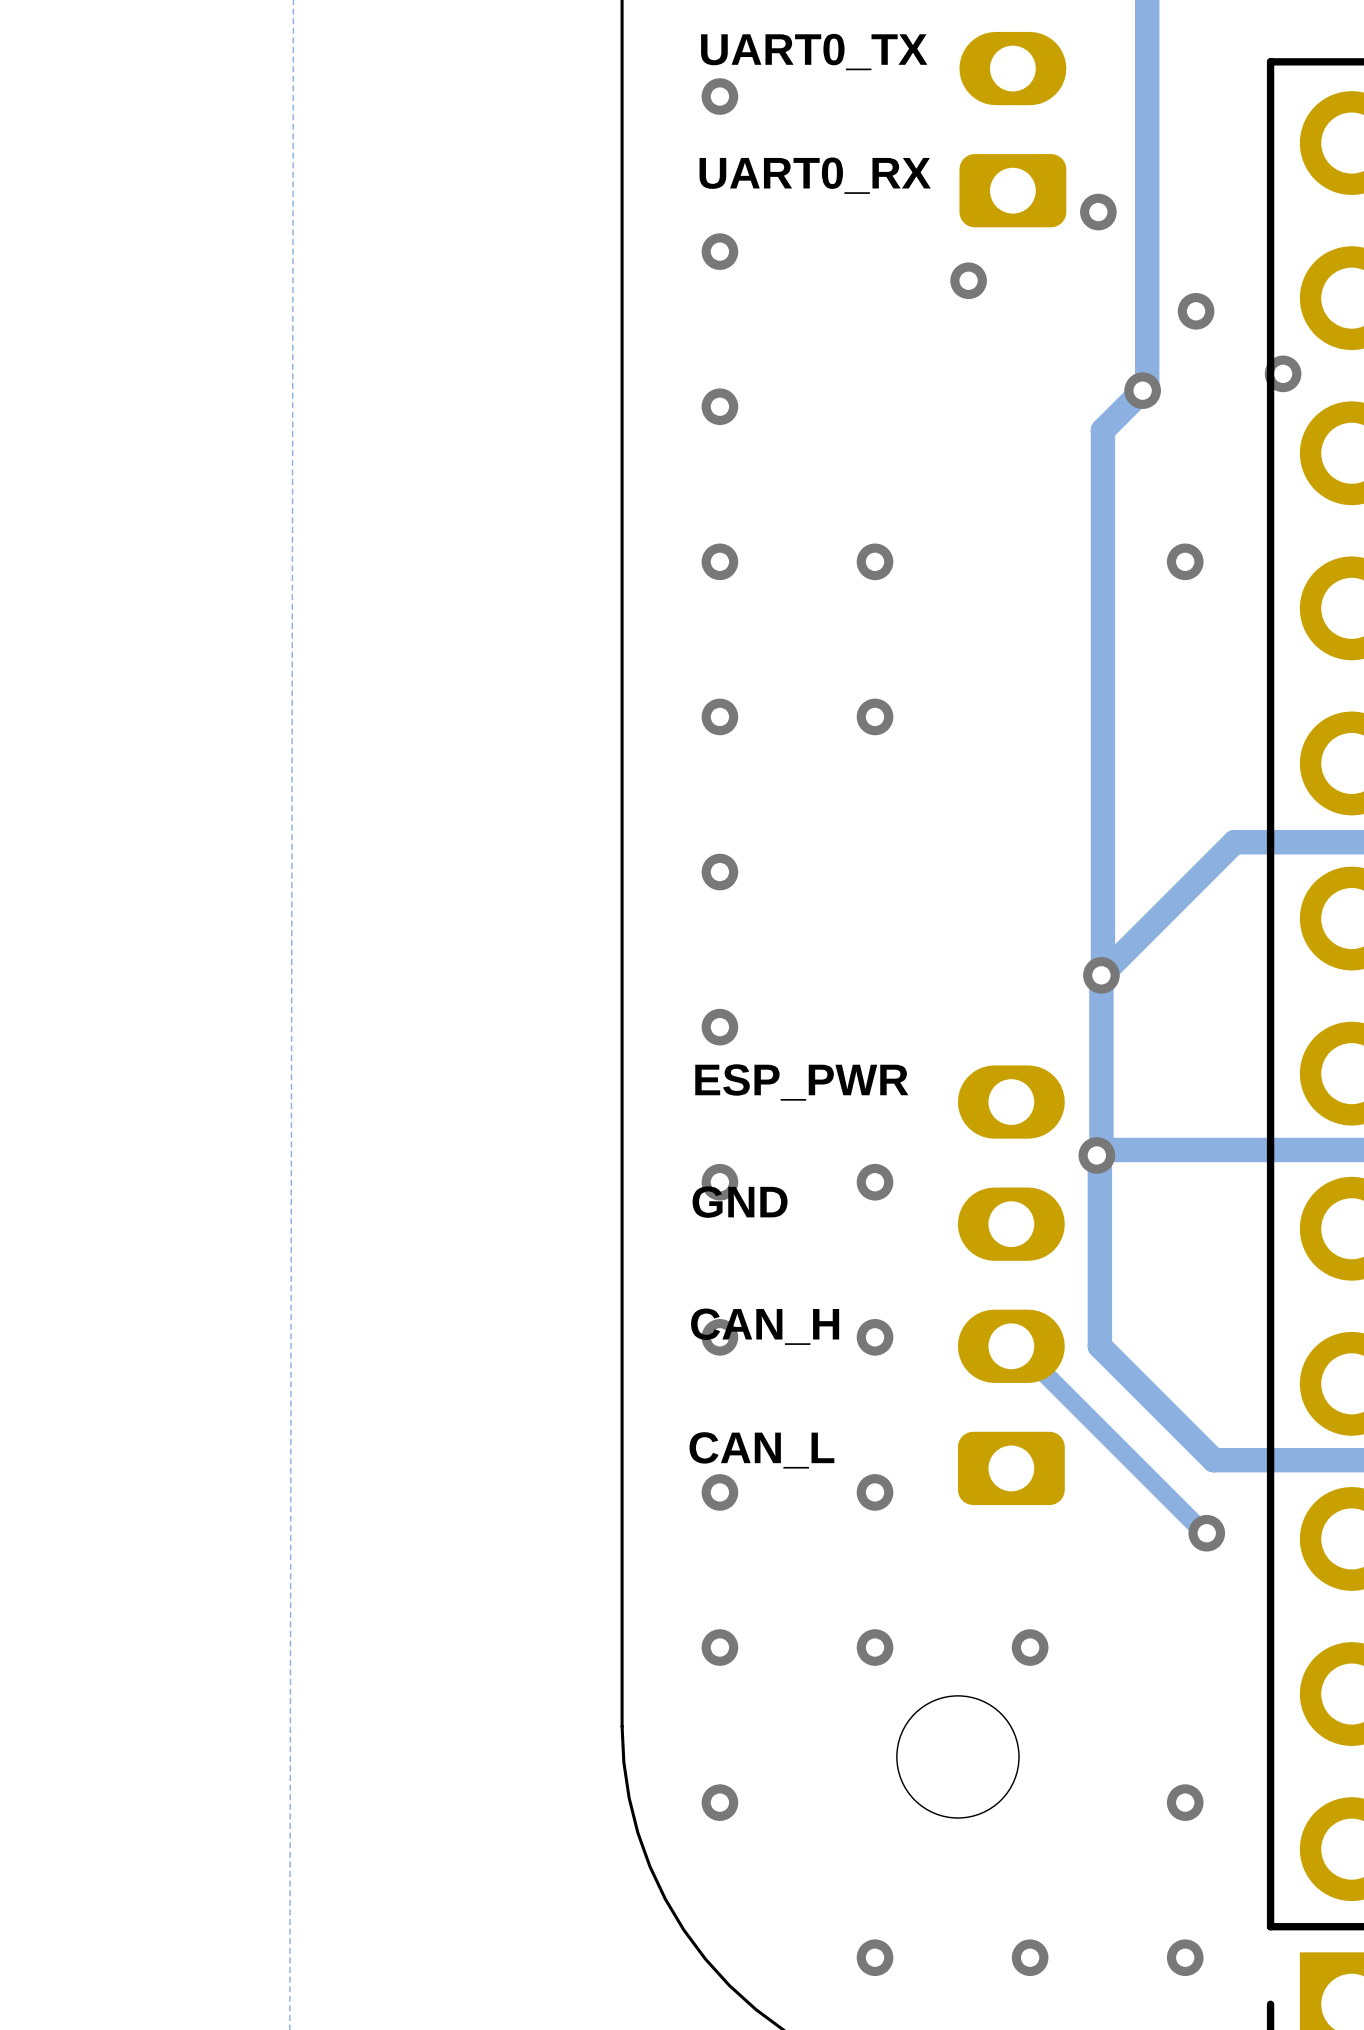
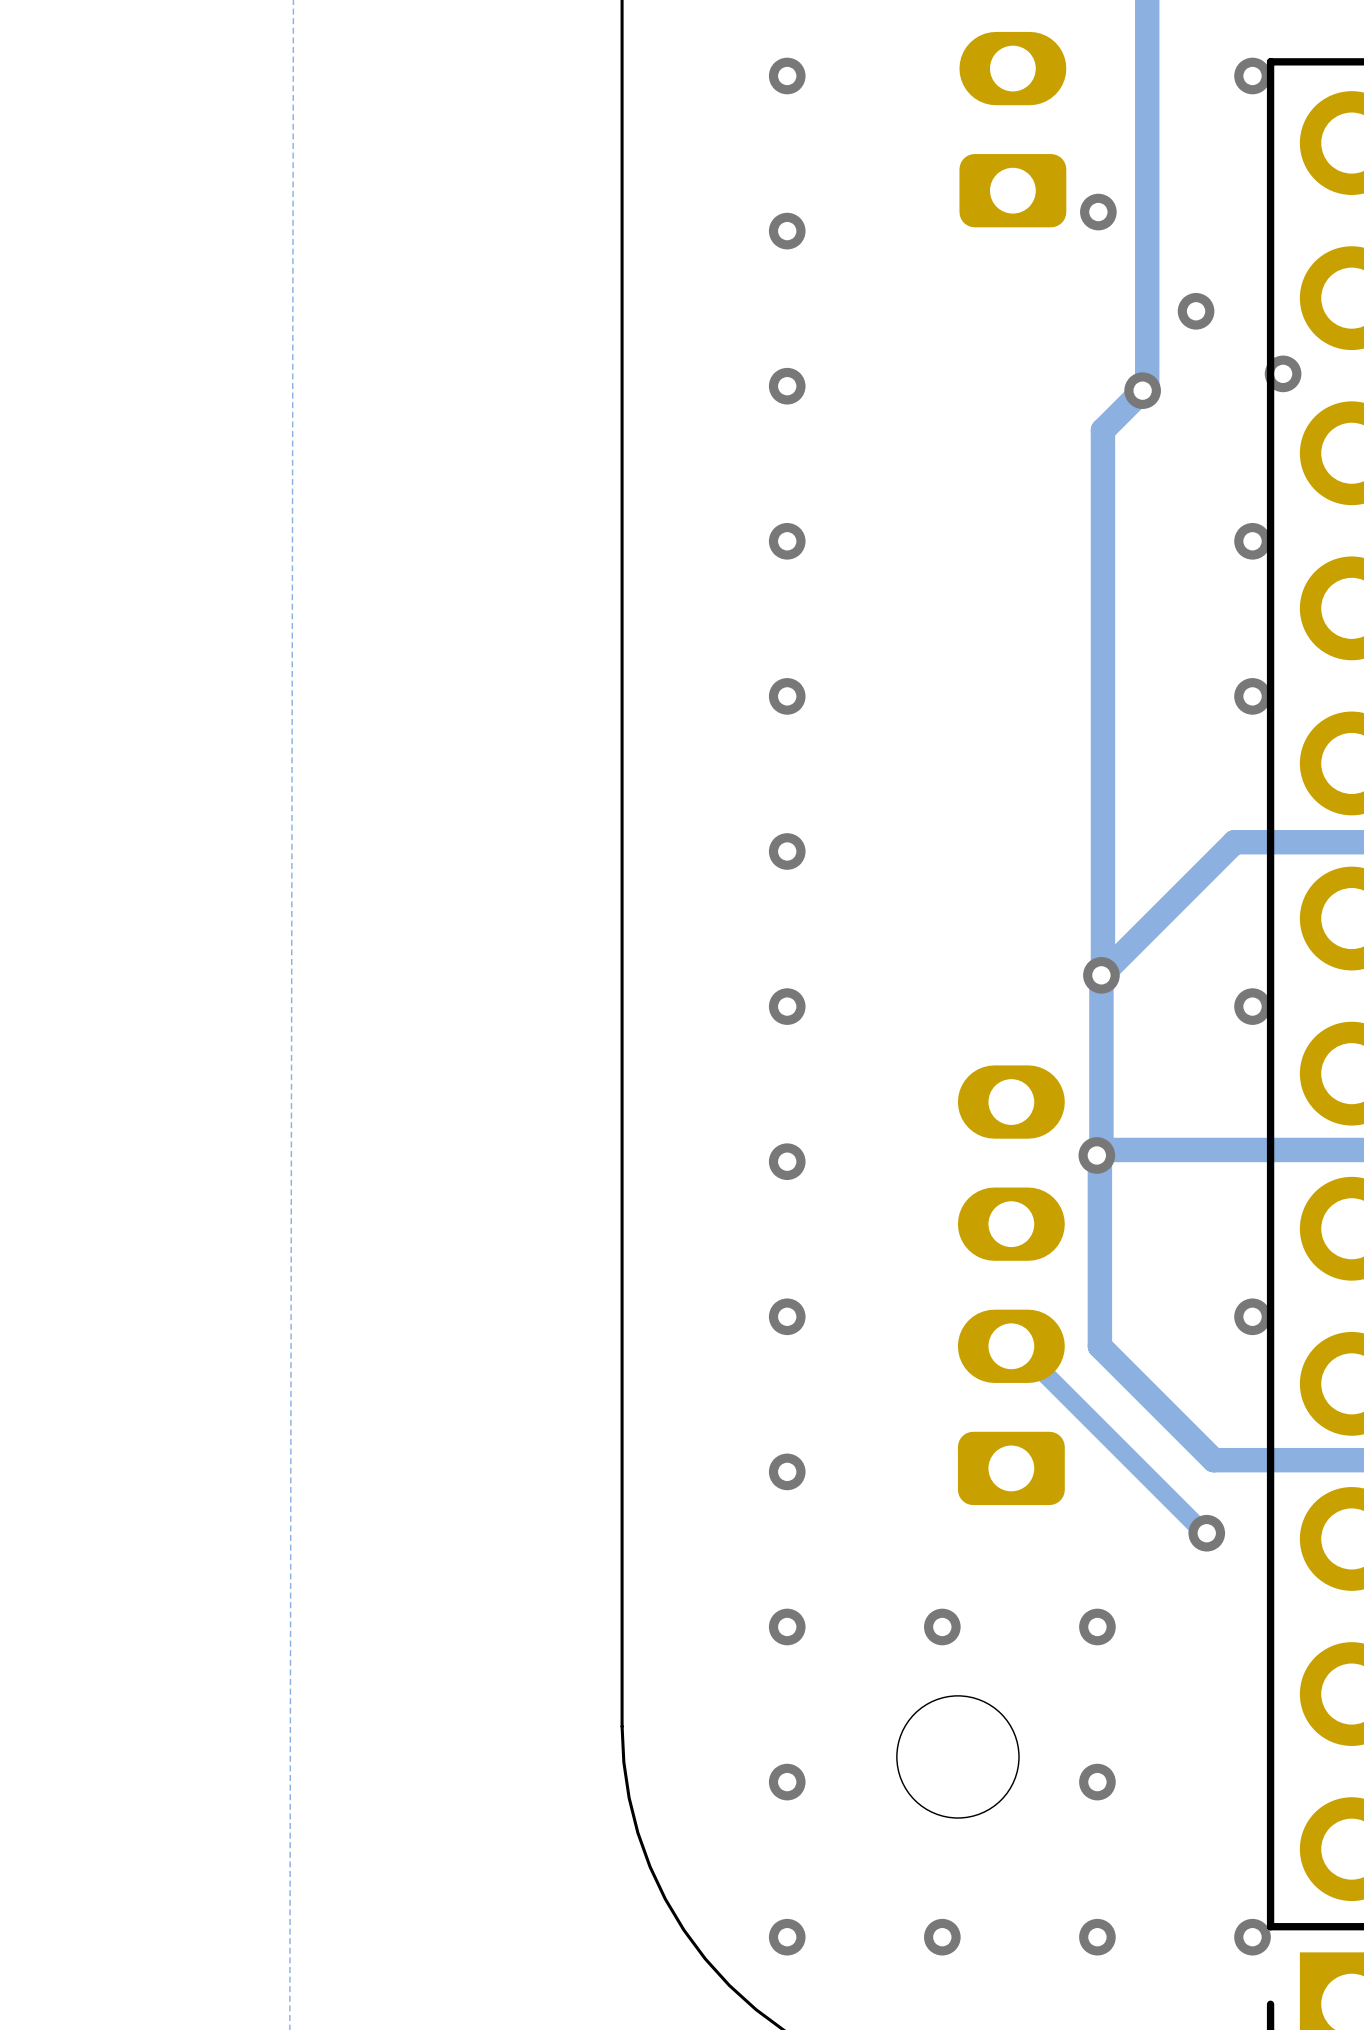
text: UART0_TX (814, 52) -> none
via: none -> (1252, 75)
via position: (719, 96) -> (787, 75)
text: UART0_RX (815, 175) -> none
via position: (719, 251) -> (787, 231)
via: (968, 280) -> none
via position: (719, 406) -> (787, 386)
via: none -> (787, 541)
via: (719, 561) -> none
via: (875, 561) -> none
via position: (1185, 561) -> (1252, 541)
via: none -> (787, 696)
via: none -> (1252, 696)
via: (719, 716) -> none
via: (875, 716) -> none
via position: (719, 872) -> (787, 851)
via: none -> (1252, 1006)
via position: (719, 1027) -> (787, 1006)
text: ESP_PWR (801, 1082) -> none
via: none -> (787, 1161)
via: (719, 1182) -> none
via: (875, 1182) -> none
text: GND (740, 1202) -> none
via: none -> (787, 1316)
via: none -> (1252, 1316)
text: CAN_H (765, 1326) -> none
via: (719, 1337) -> none
via: (875, 1337) -> none
text: CAN_L (761, 1450) -> none
via: none -> (787, 1471)
via: (719, 1492) -> none
via: (875, 1492) -> none
via: none -> (787, 1626)
via: none -> (942, 1626)
via: none -> (1097, 1626)
via: (719, 1647) -> none
via: (875, 1647) -> none
via: (1030, 1647) -> none
via: none -> (1097, 1782)
via position: (719, 1802) -> (787, 1782)
via: (1185, 1802) -> none
via: none -> (787, 1937)
via: none -> (942, 1937)
via: none -> (1097, 1937)
via: none -> (1252, 1937)
via: (875, 1957) -> none
via: (1030, 1957) -> none
via: (1185, 1957) -> none

